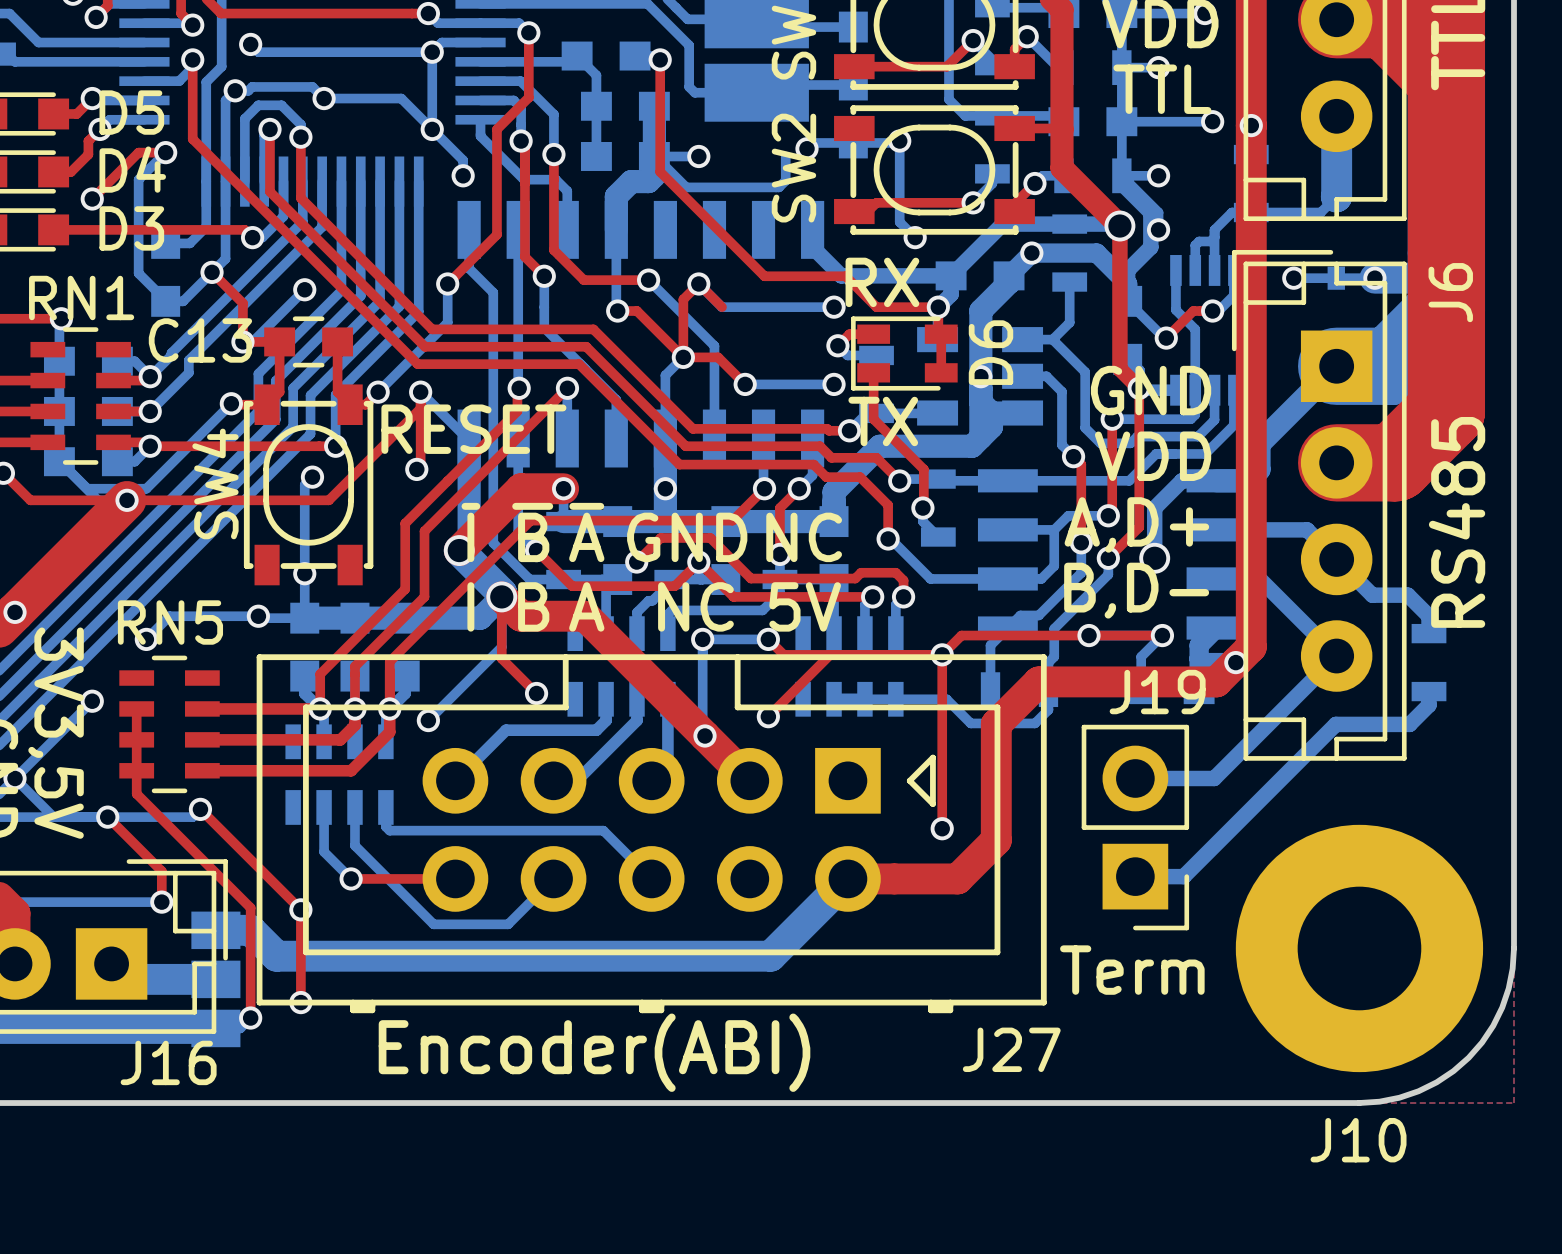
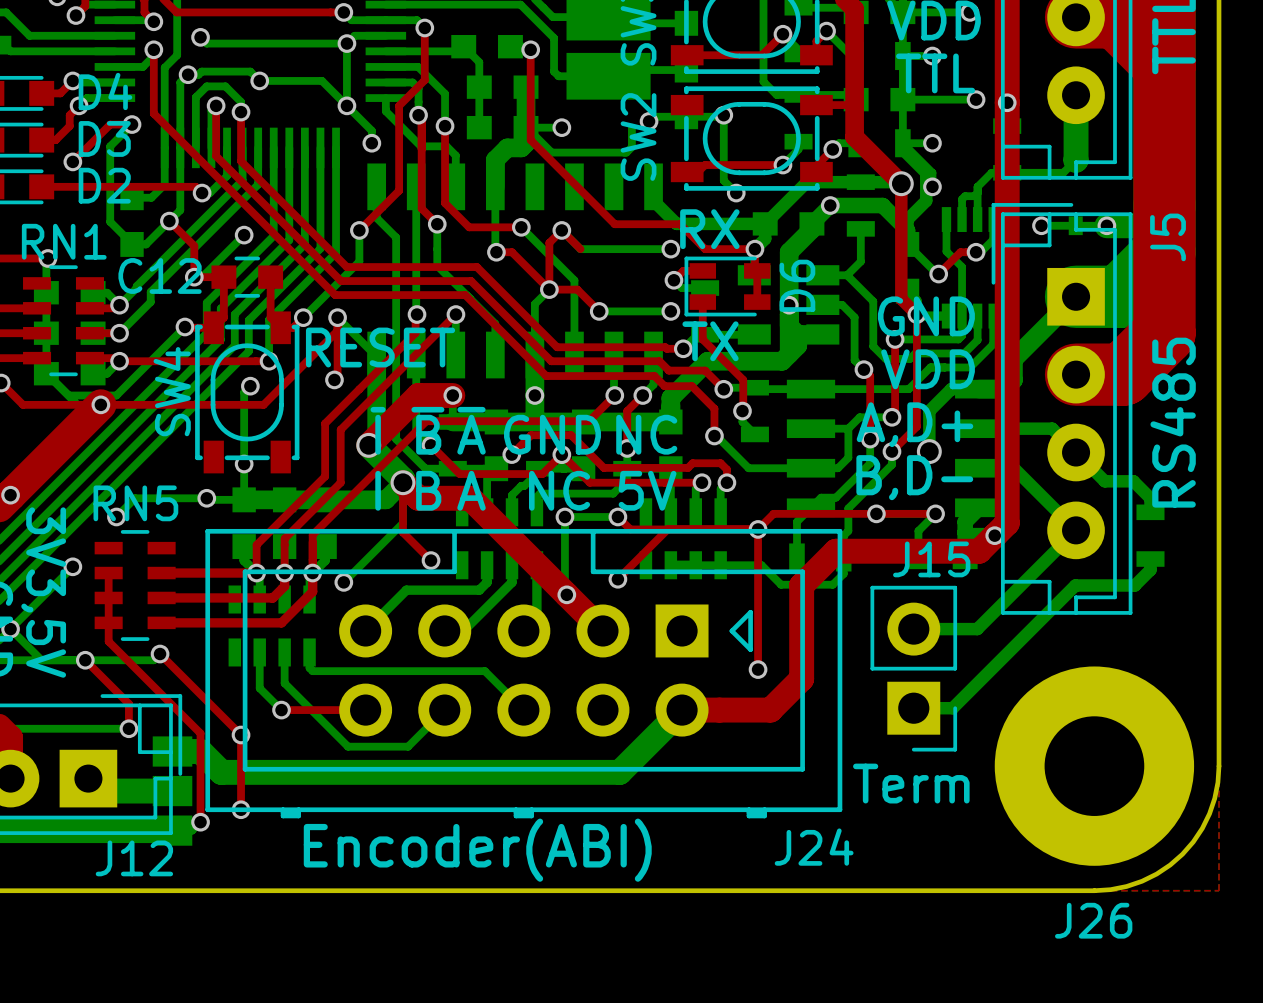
D5 name: D5 (131, 112) -> D4 (105, 91)
D4 name: D4 (132, 169) -> D3 (104, 138)
D3 name: D3 (131, 228) -> D2 (104, 185)
J6 name: J6 (1450, 292) -> J5 (1168, 237)
C13 name: C13 (200, 340) -> C12 (160, 275)
J19 name: J19 (1157, 692) -> J15 (931, 559)
J27 name: J27 (1011, 1049) -> J24 (814, 847)
J16 name: J16 (168, 1062) -> J12 (134, 858)
J10 name: J10 (1358, 1140) -> J26 (1093, 920)

